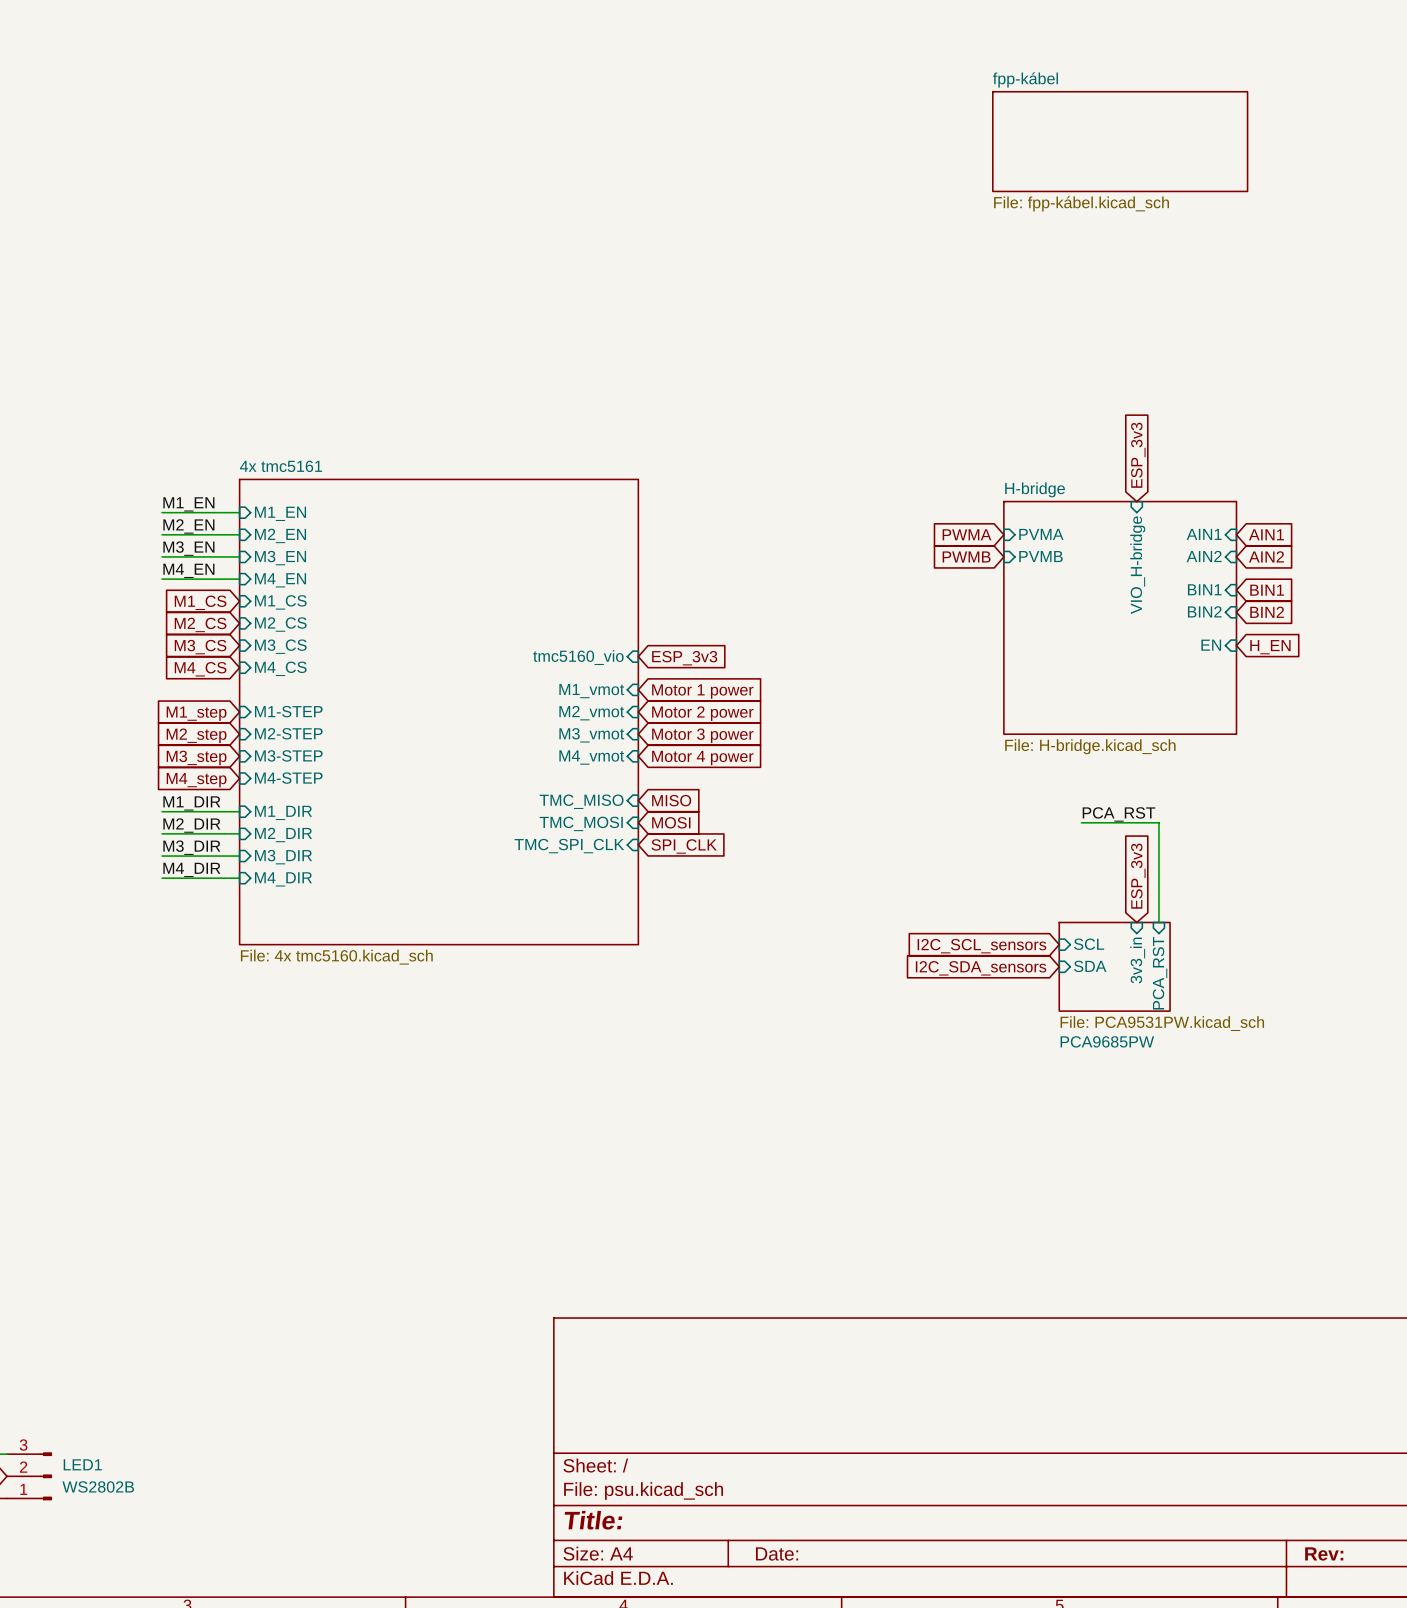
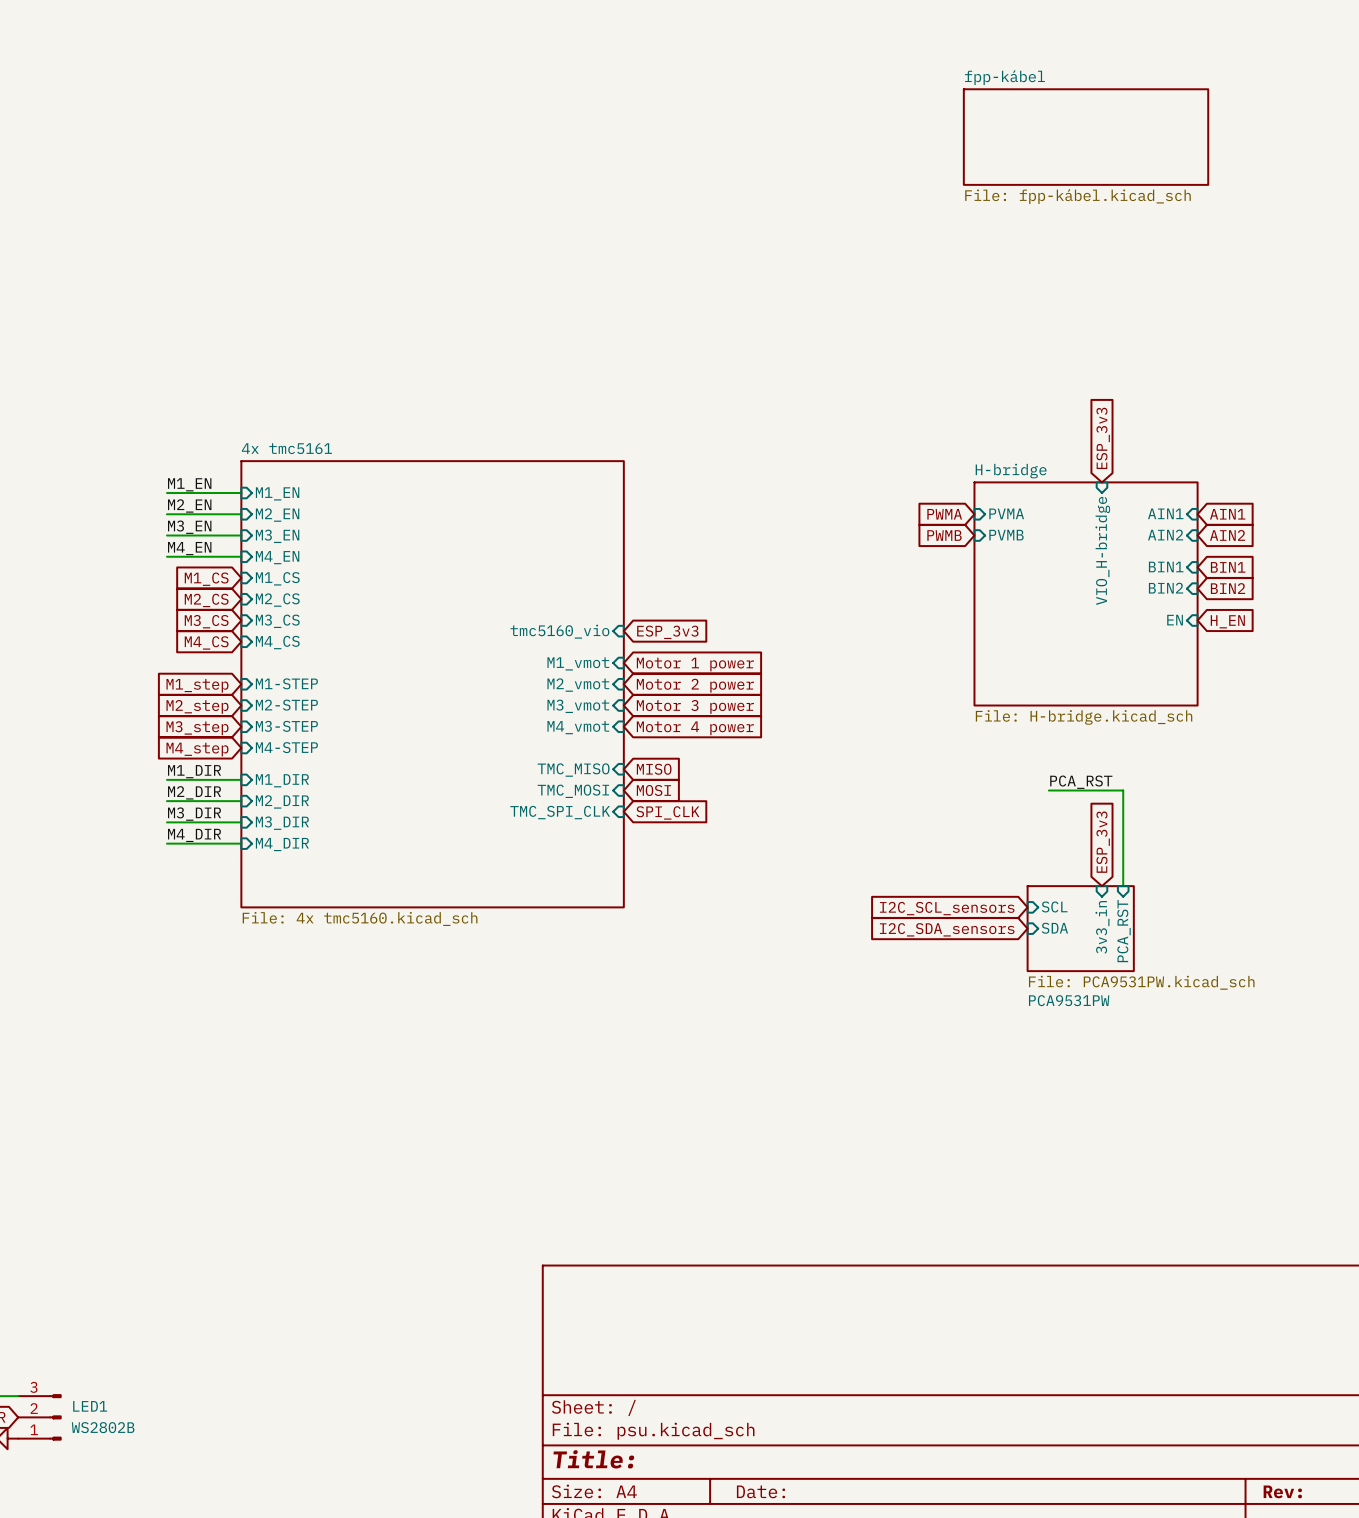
sheet PCA9685PW name: PCA9685PW (1107, 1041) -> PCA9531PW (1069, 1000)

